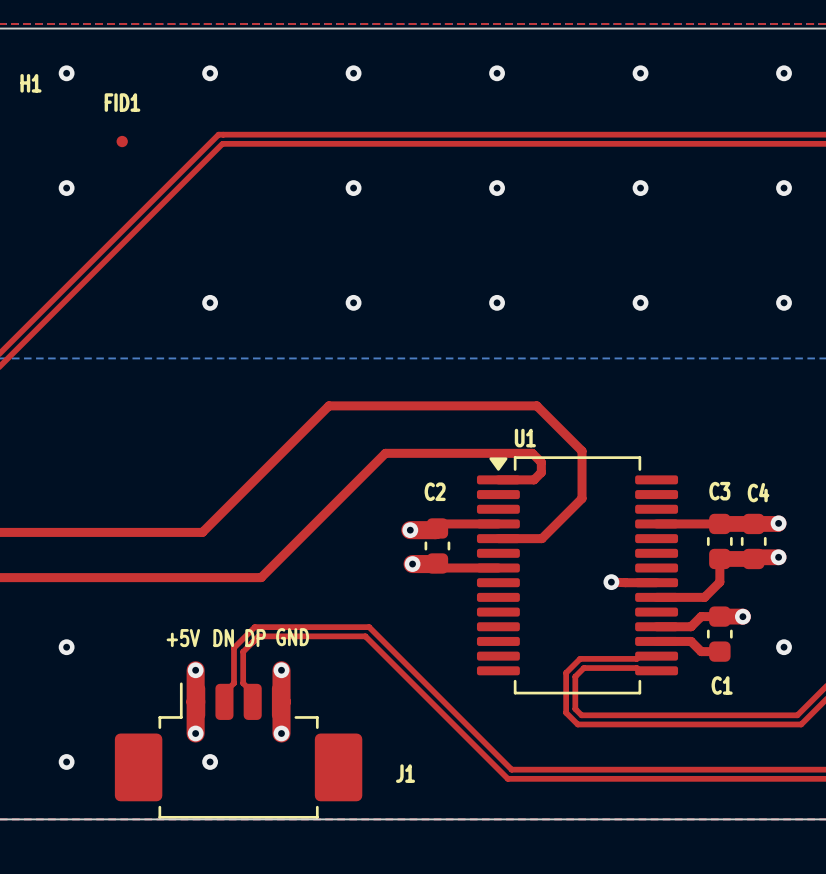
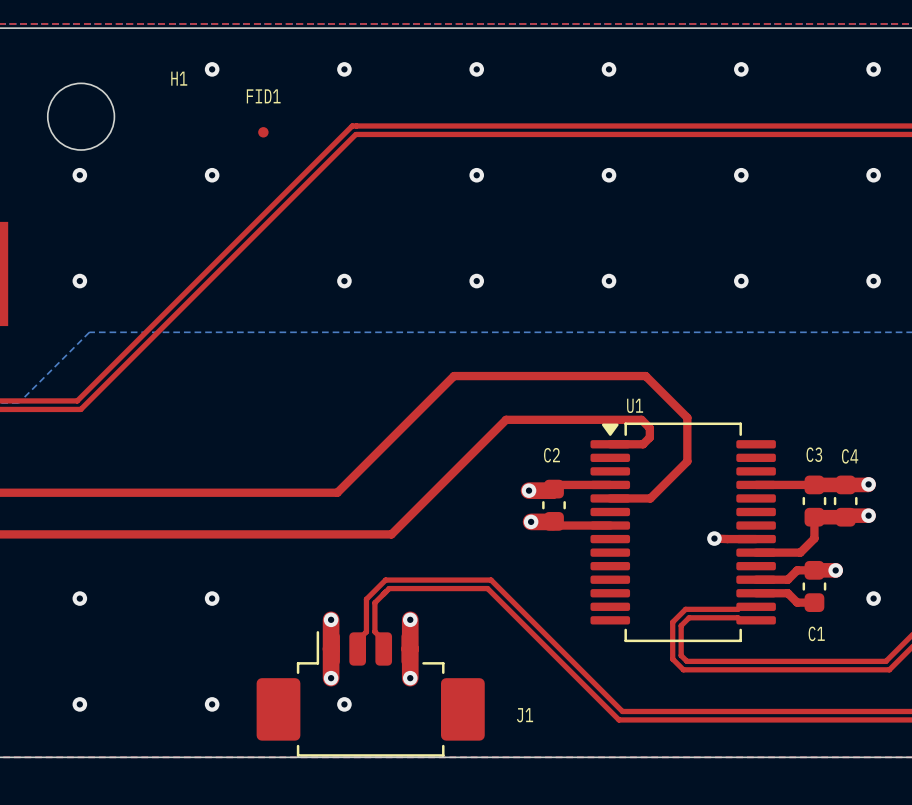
text: GND (292, 637) -> none
text: +5V (183, 638) -> none
text: DN (223, 638) -> none
text: DP (255, 638) -> none

